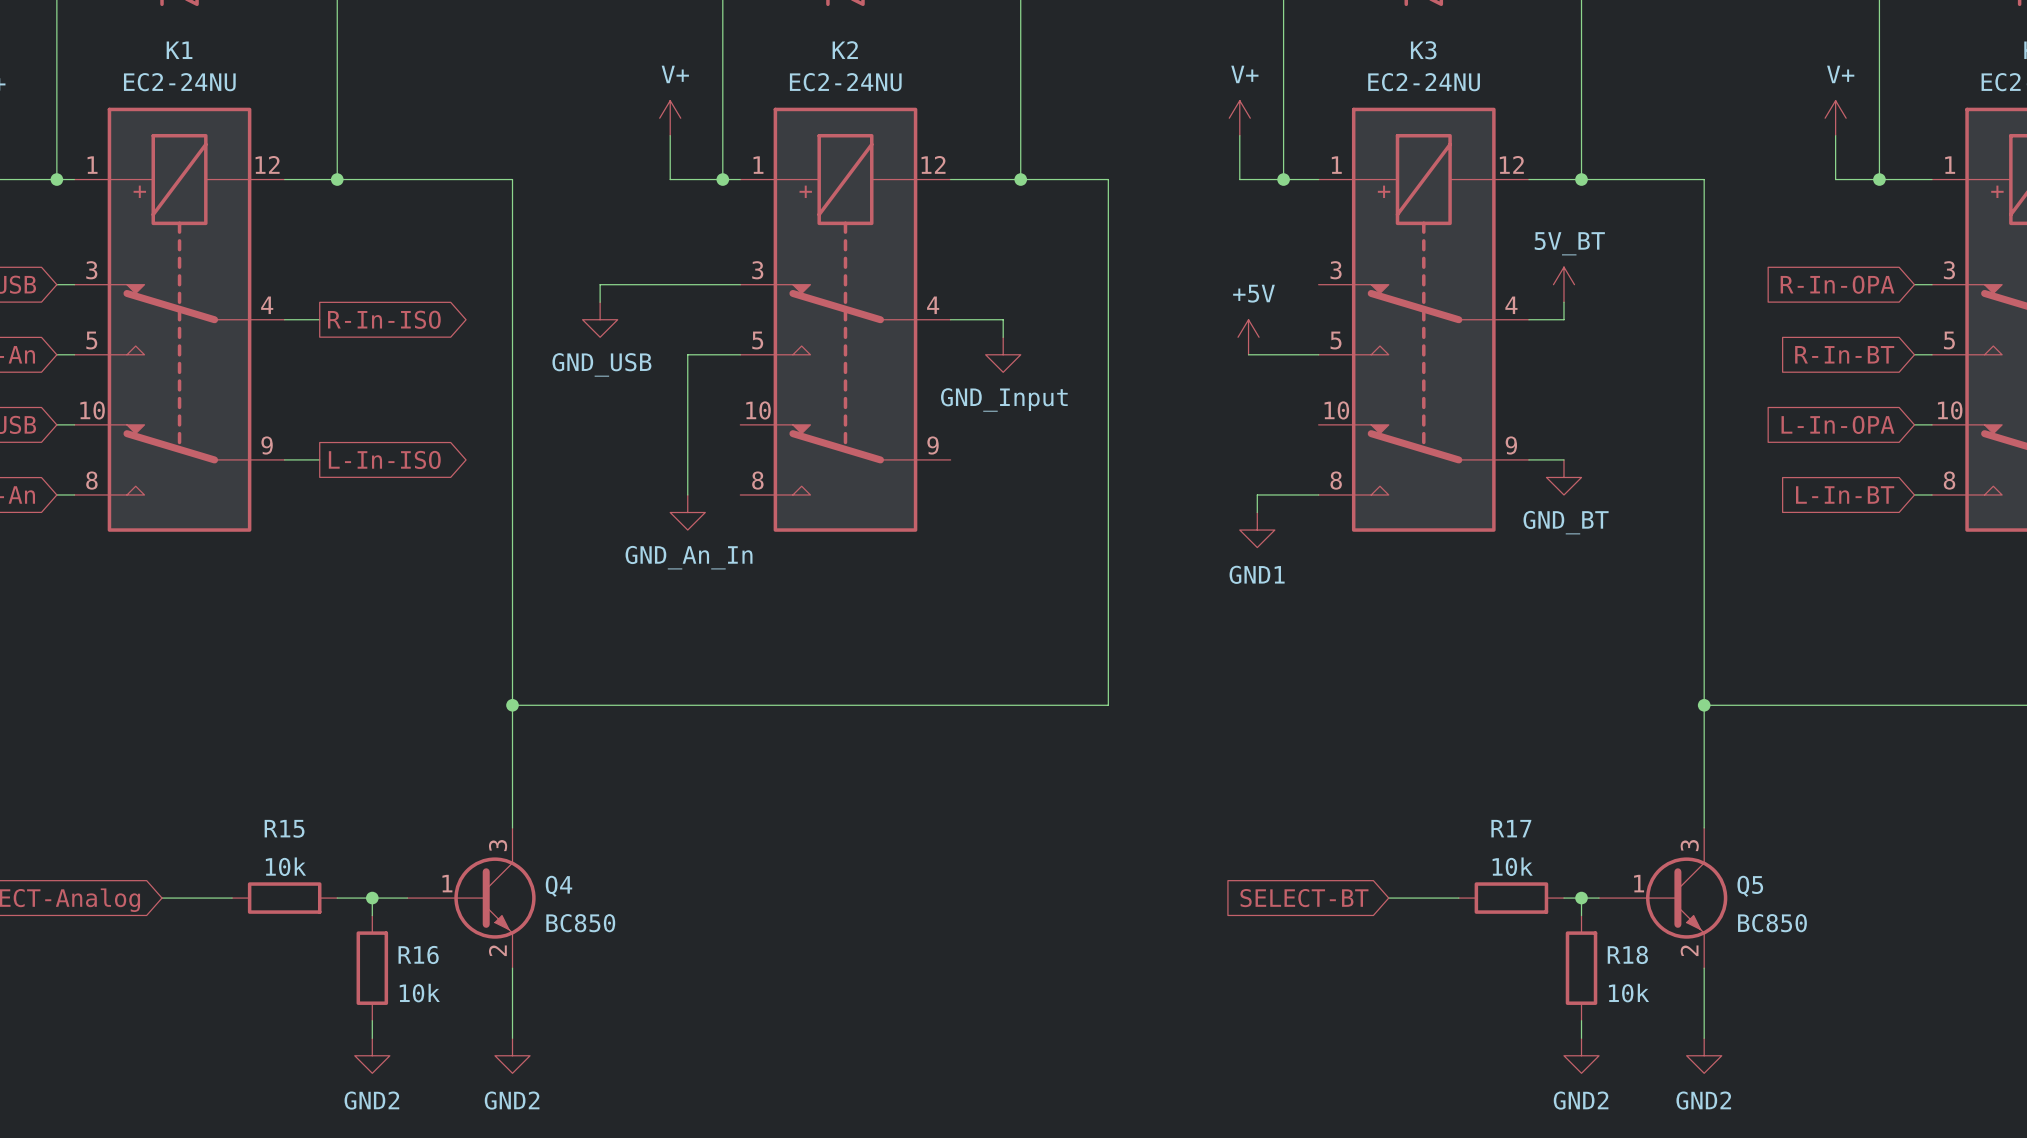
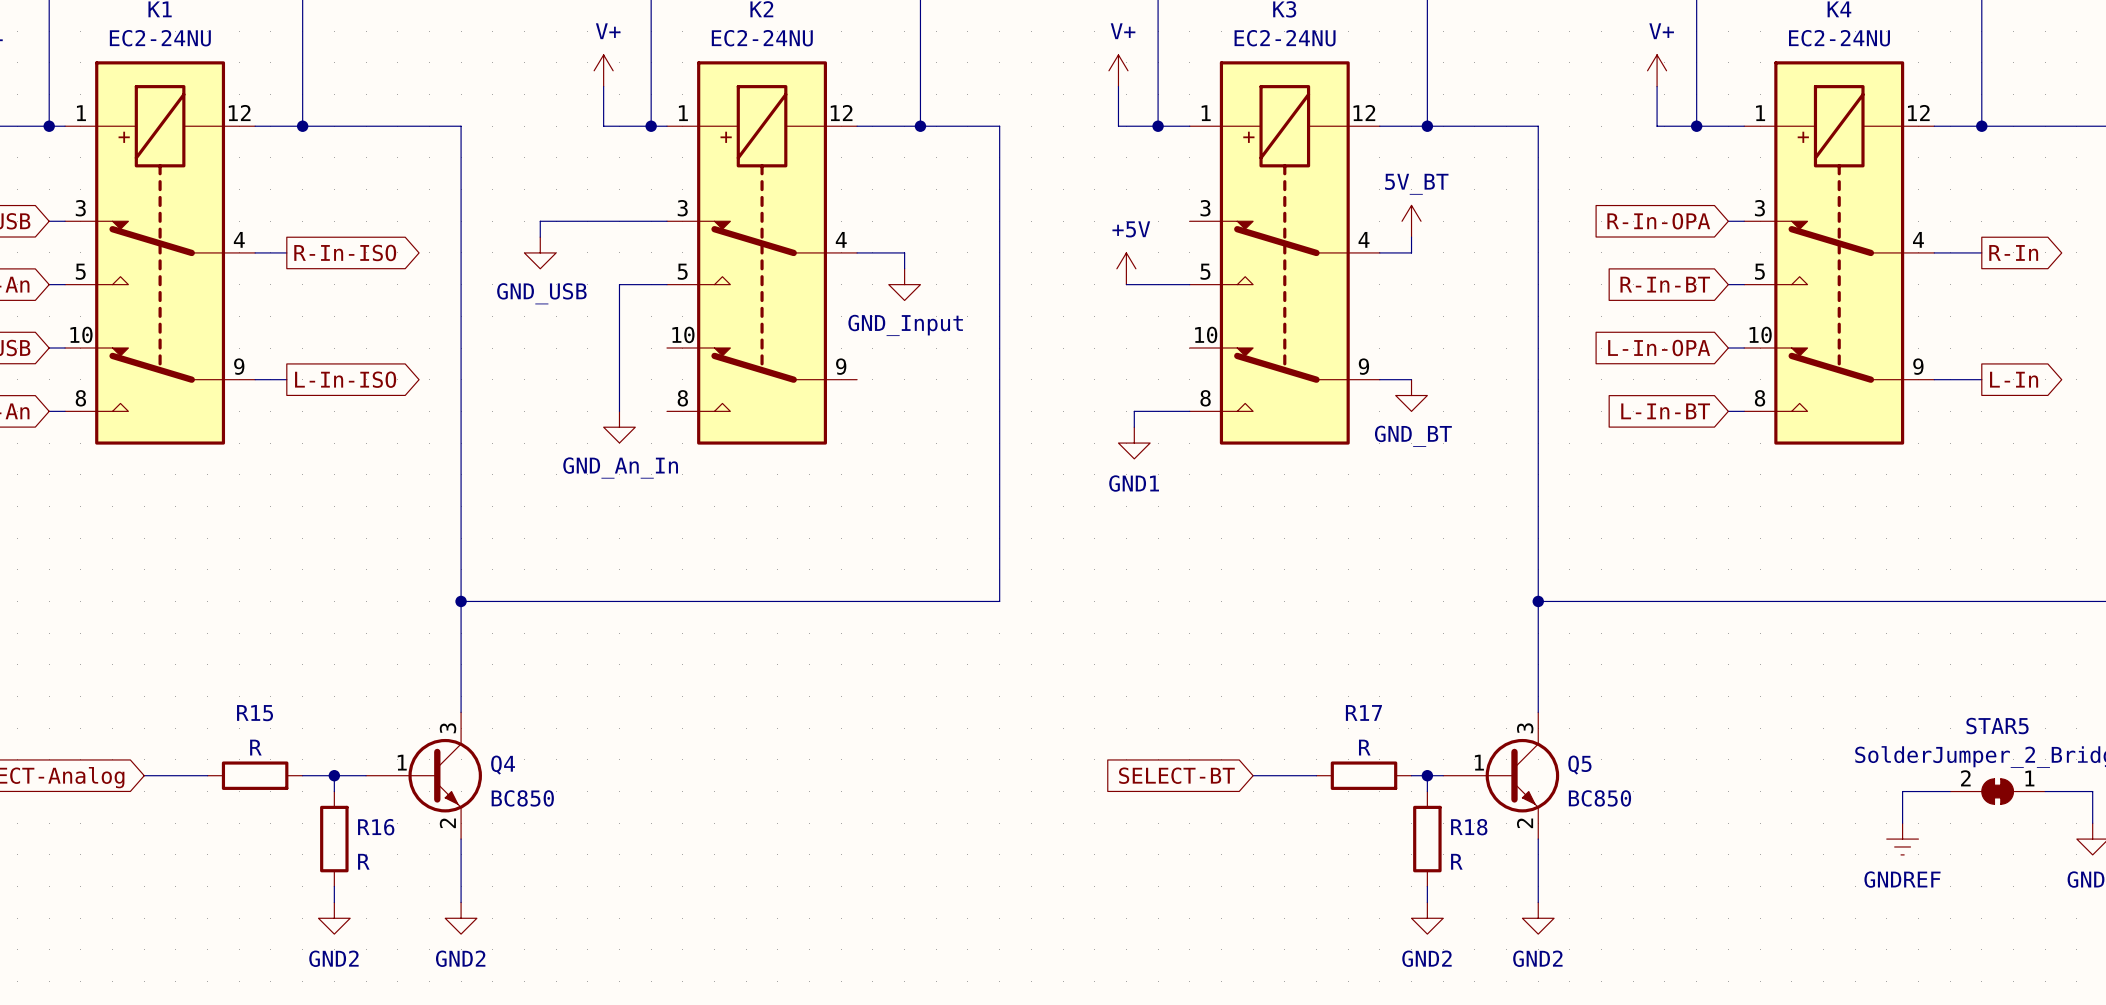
R15 value: 10k (285, 866) -> R (255, 747)
R17 value: 10k (1512, 866) -> R (1364, 747)
R16 value: 10k (419, 993) -> R (363, 861)
R18 value: 10k (1629, 993) -> R (1456, 861)

